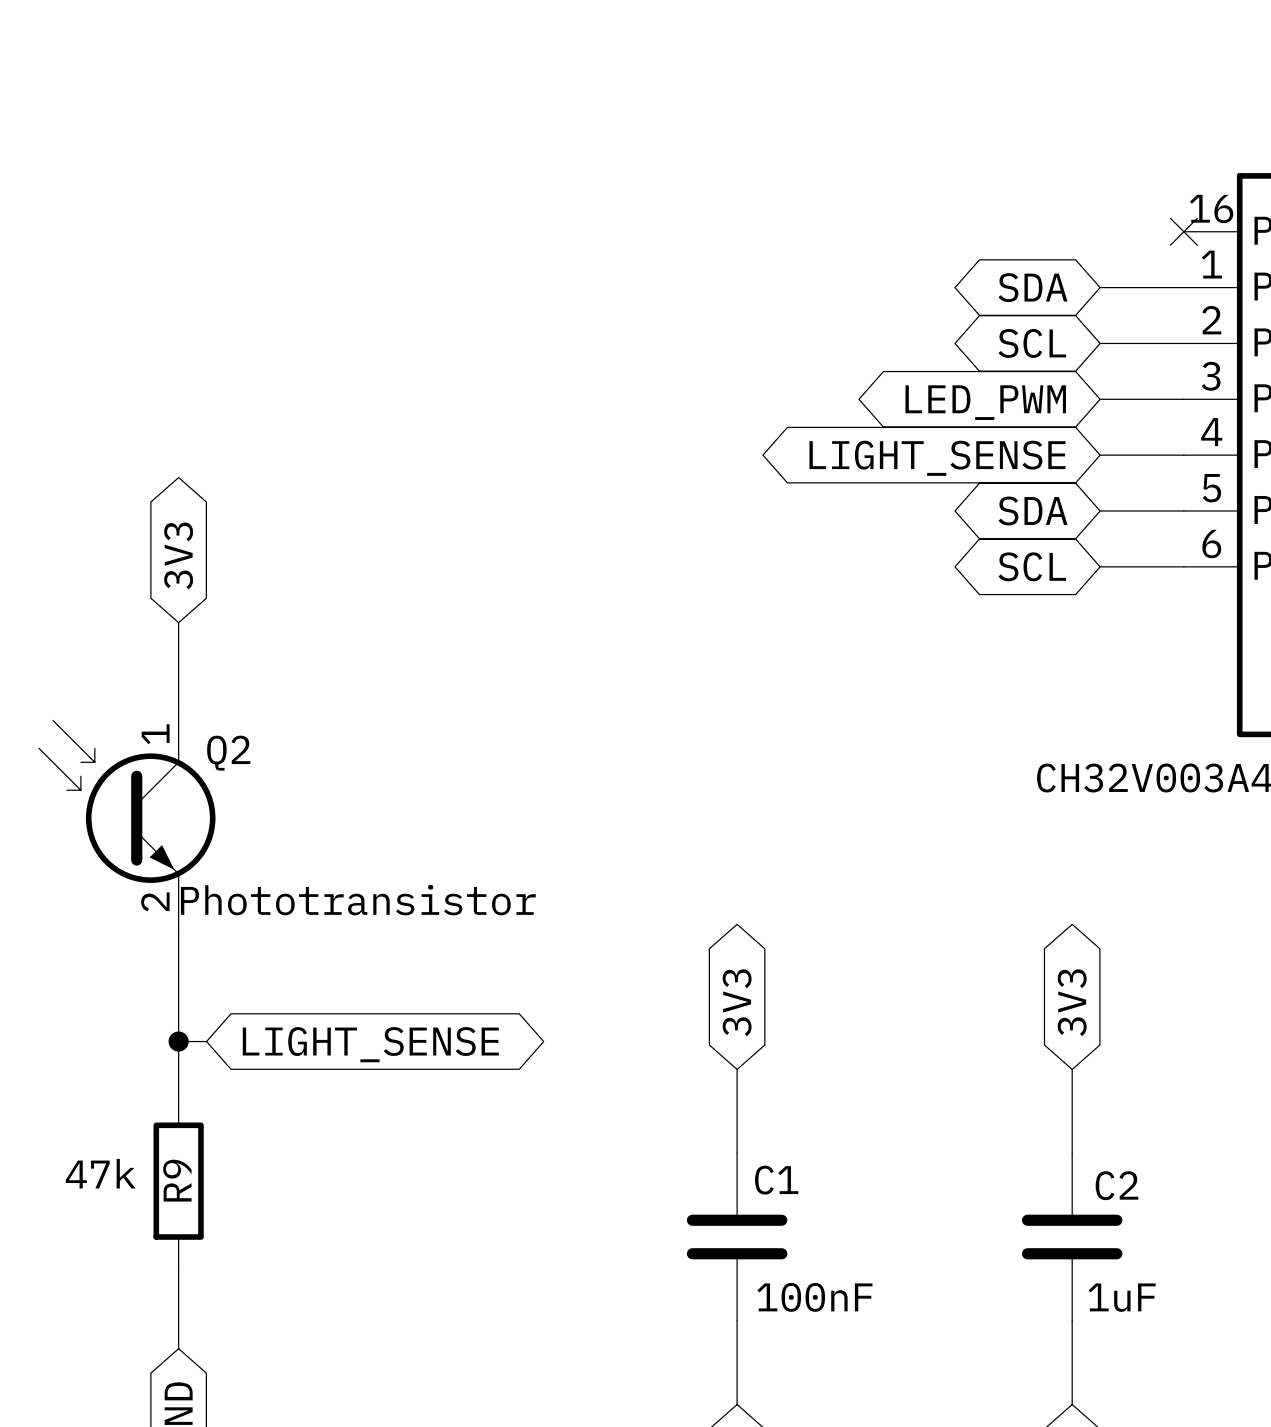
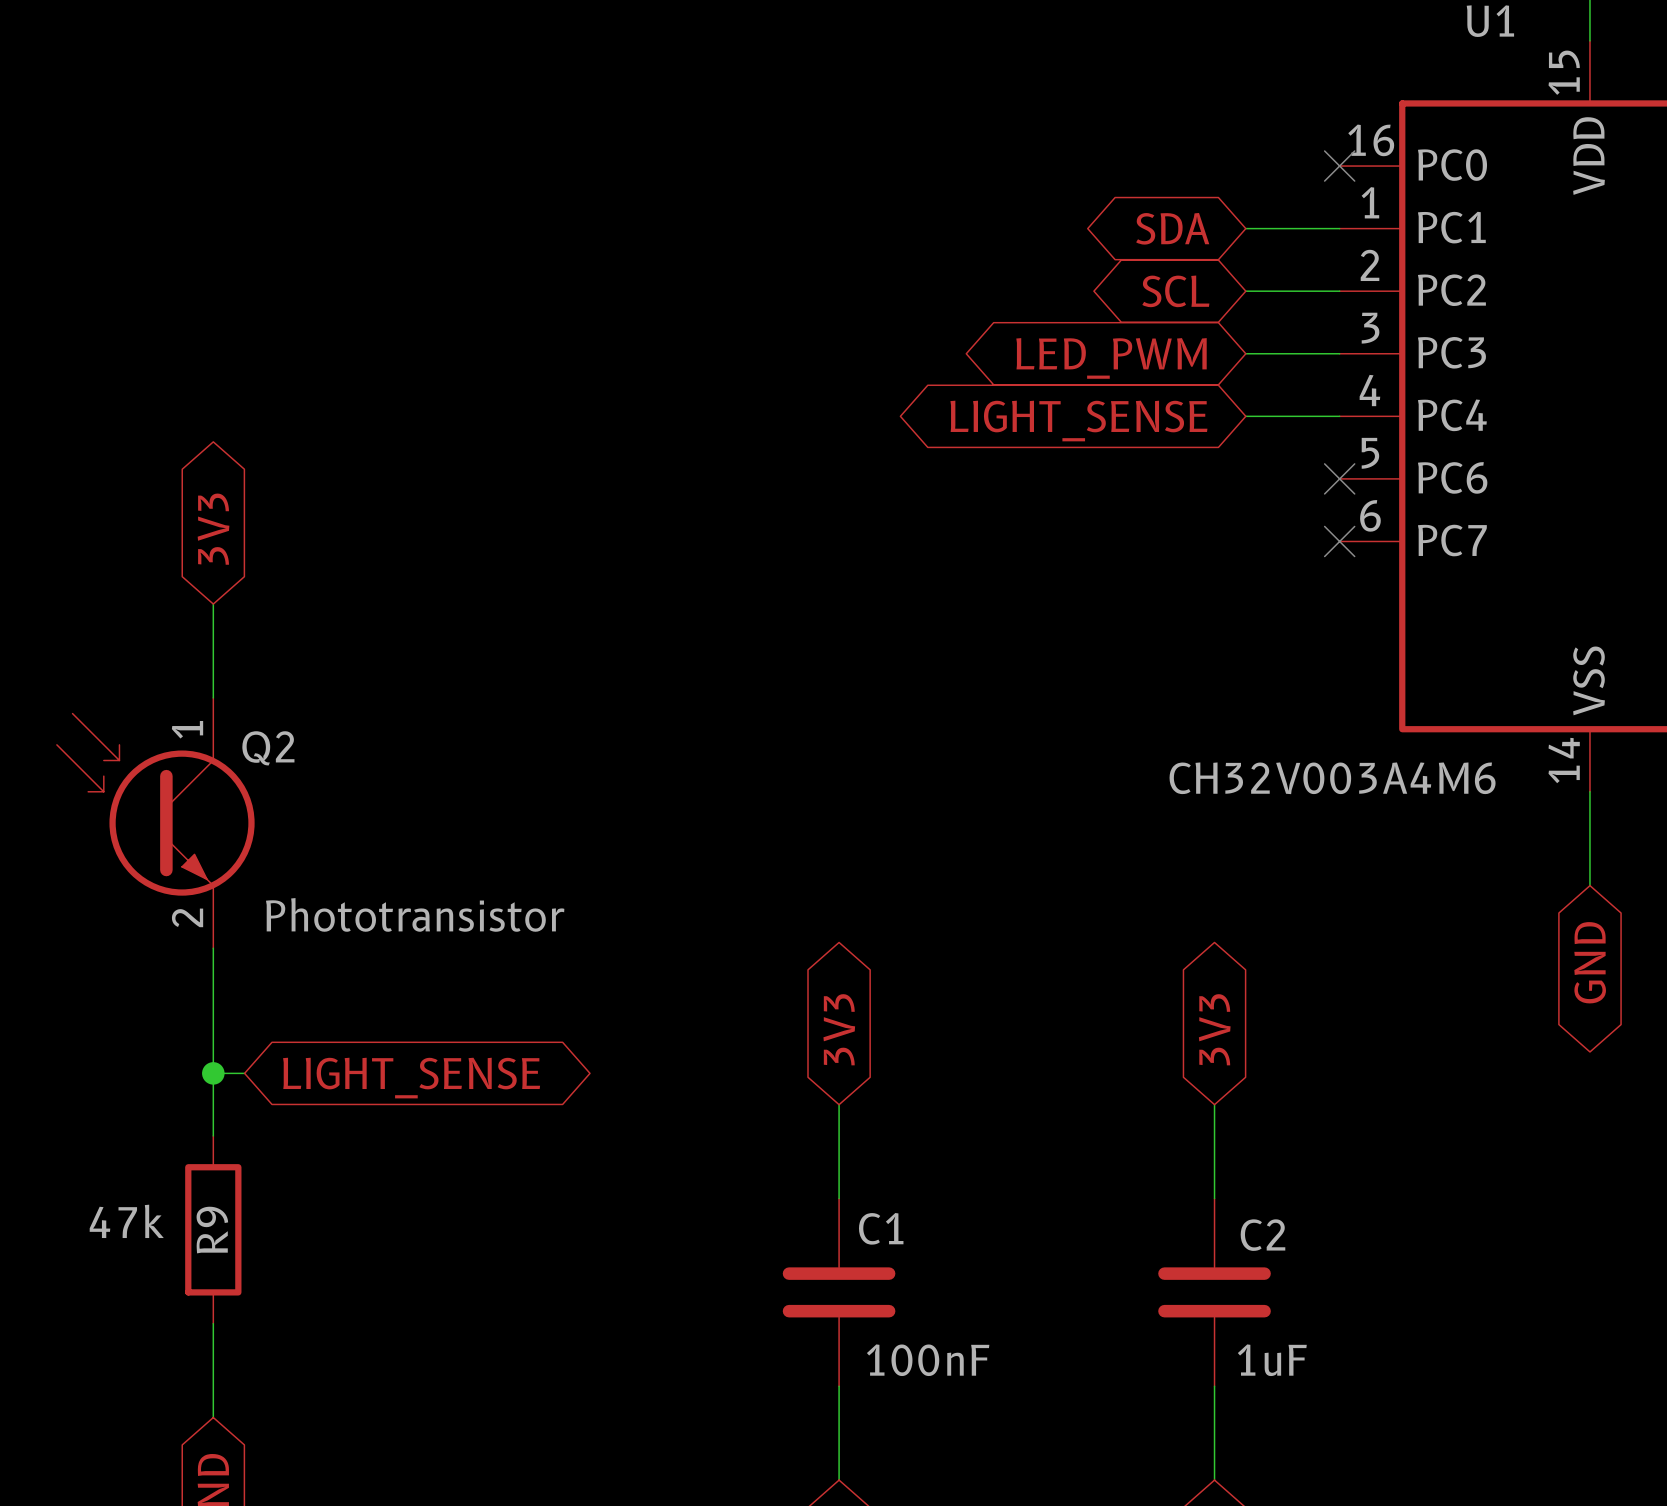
global label: SDA (1032, 510) -> none
wire: (1100, 510) (1183, 510) -> none
no-connect mark: none -> (1339, 478)
global label: SCL (1032, 566) -> none
wire: (1100, 566) (1183, 566) -> none
no-connect mark: none -> (1339, 541)

